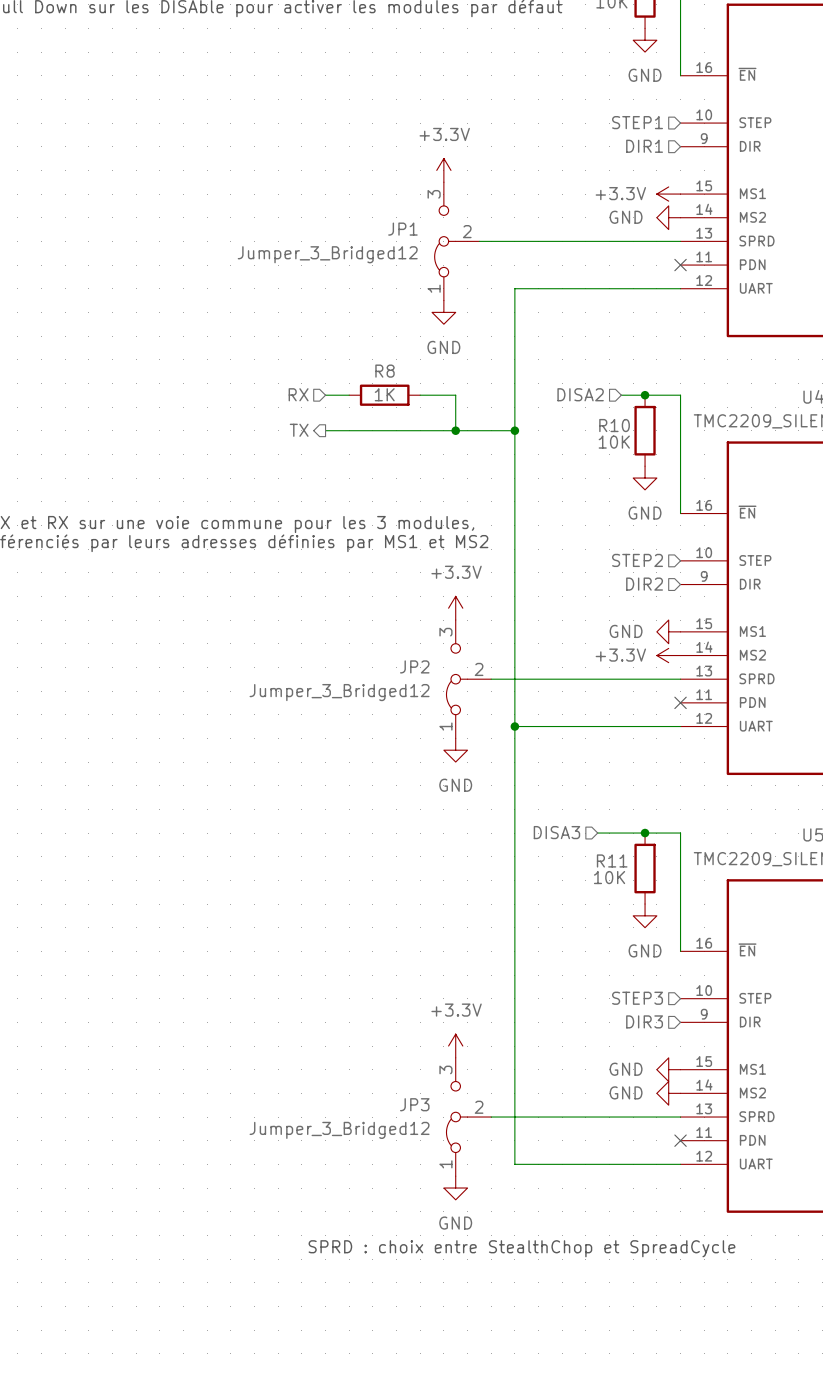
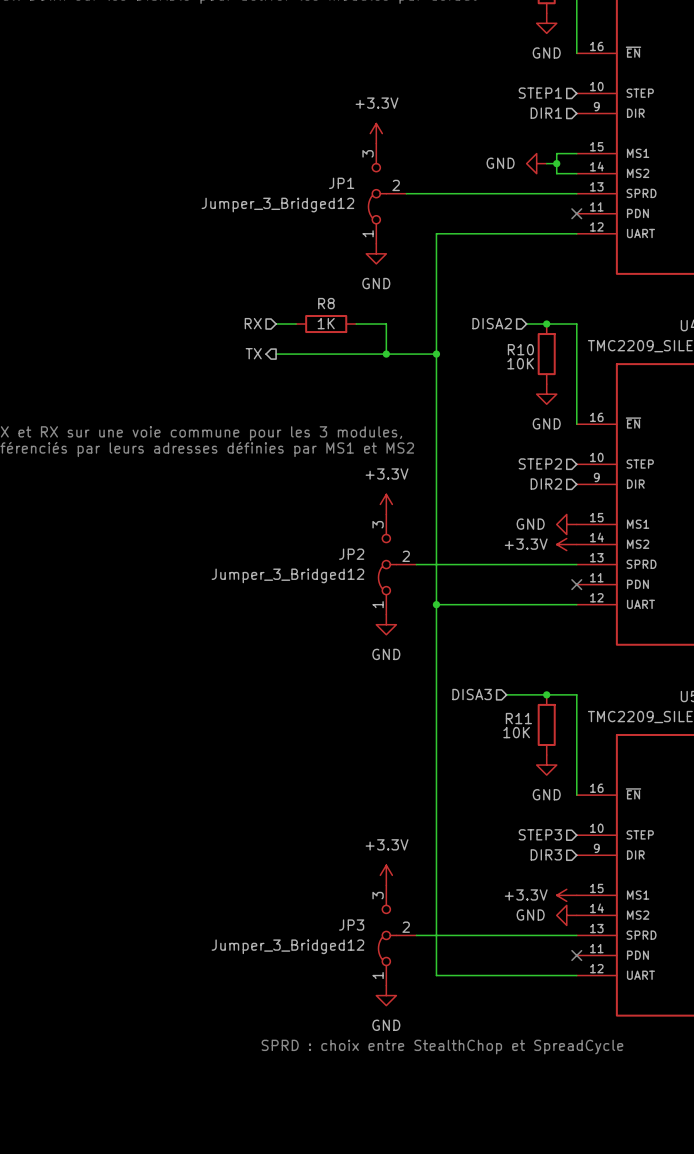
power symbol: +3.3V (668, 194) -> none
wire: none -> (546, 163) (556, 163)
junction: none -> (556, 163)
power symbol position: GND (668, 217) -> GND (536, 163)
power symbol: GND (668, 1069) -> +3.3V (566, 895)

